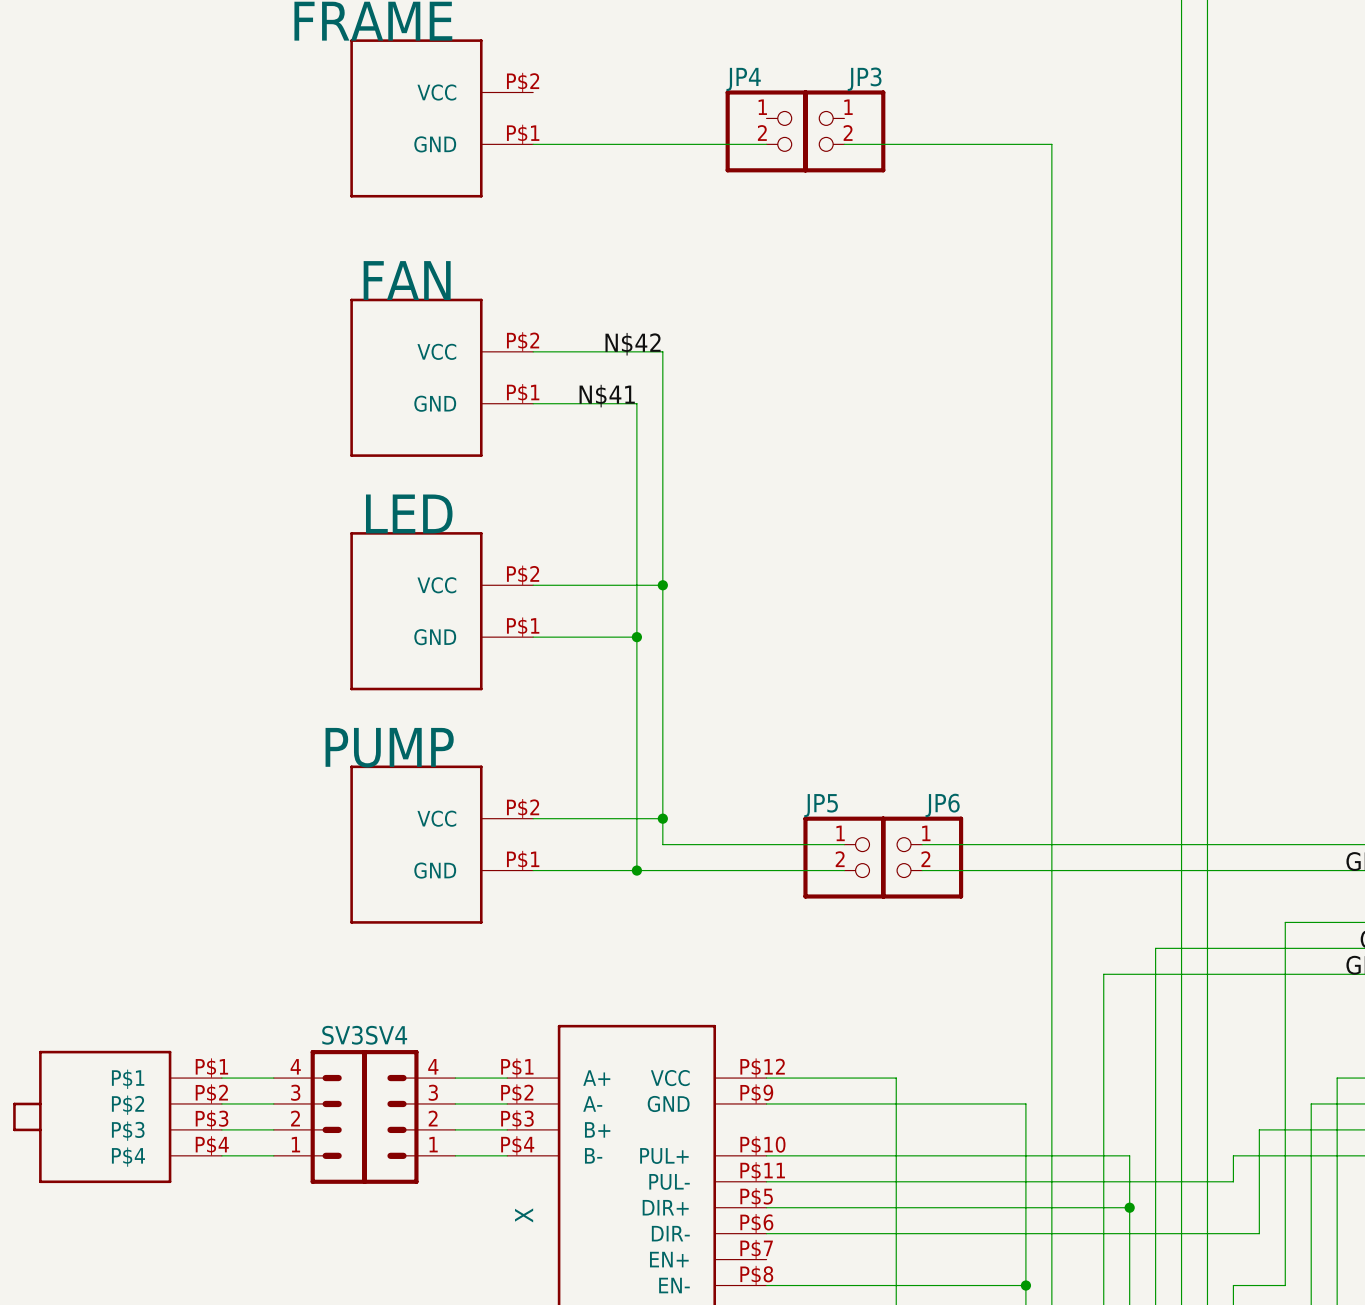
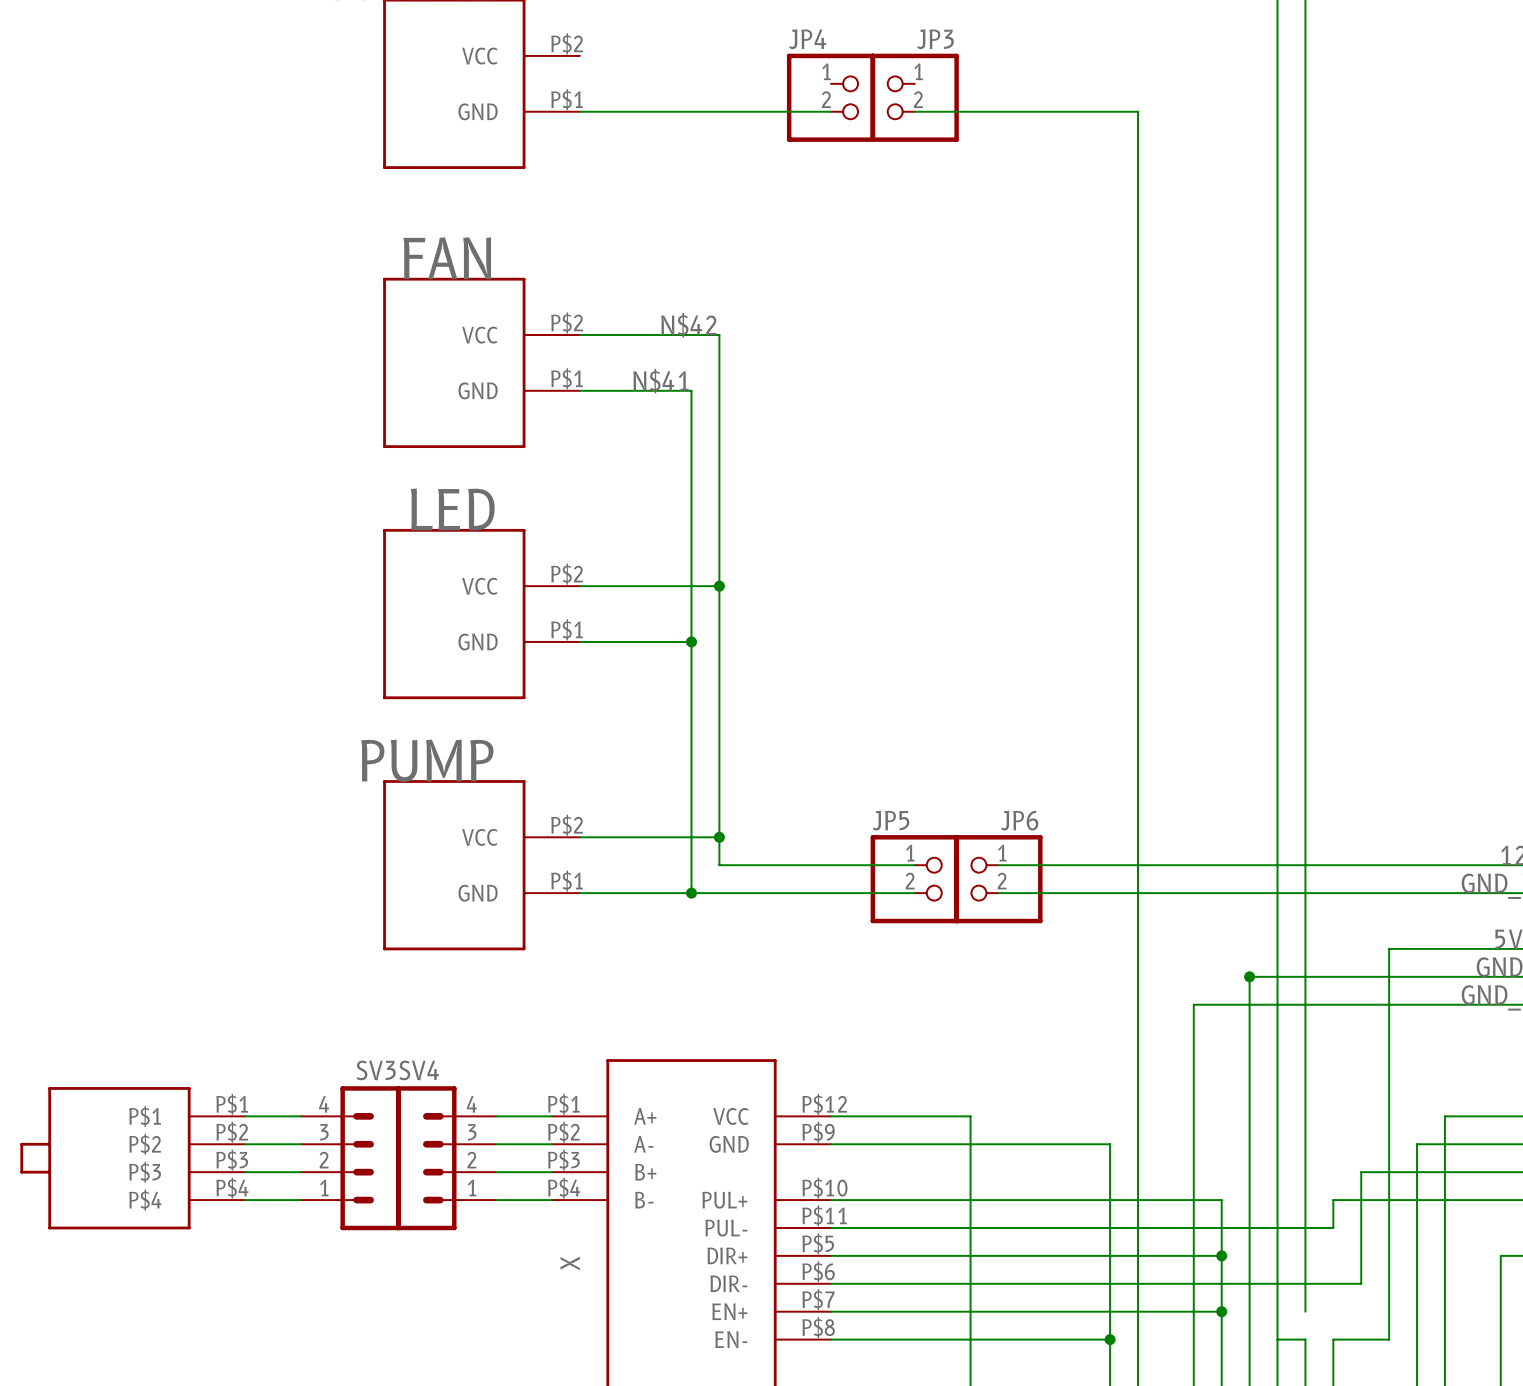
junction: none -> (1249, 976)
wire: none -> (831, 1311) (1221, 1311)
junction: none -> (1221, 1311)
wire: (1207, 1259) (1207, 1285) -> (1277, 1339) (1305, 1339)

